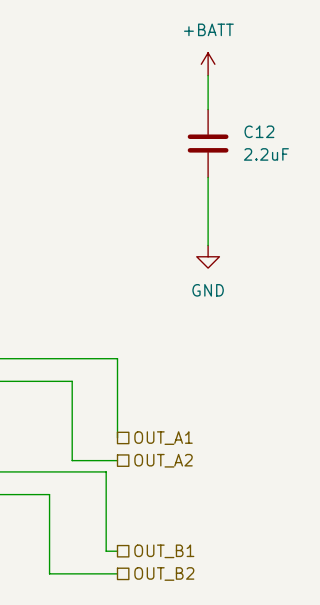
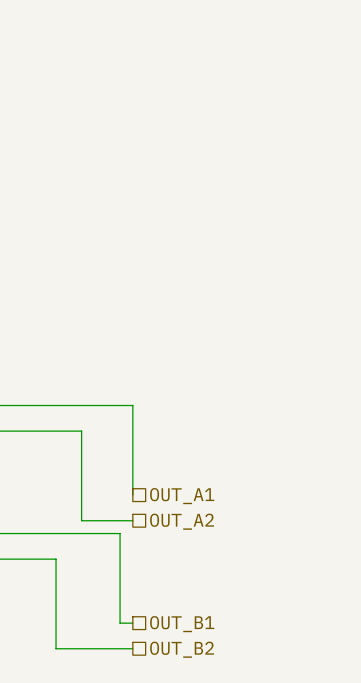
power symbol: +BATT (208, 64) -> none
wire: (208, 75) (208, 109) -> none
C12: 2.2uF (208, 143) -> none
wire: (208, 177) (208, 245) -> none
power symbol: GND (208, 256) -> none

